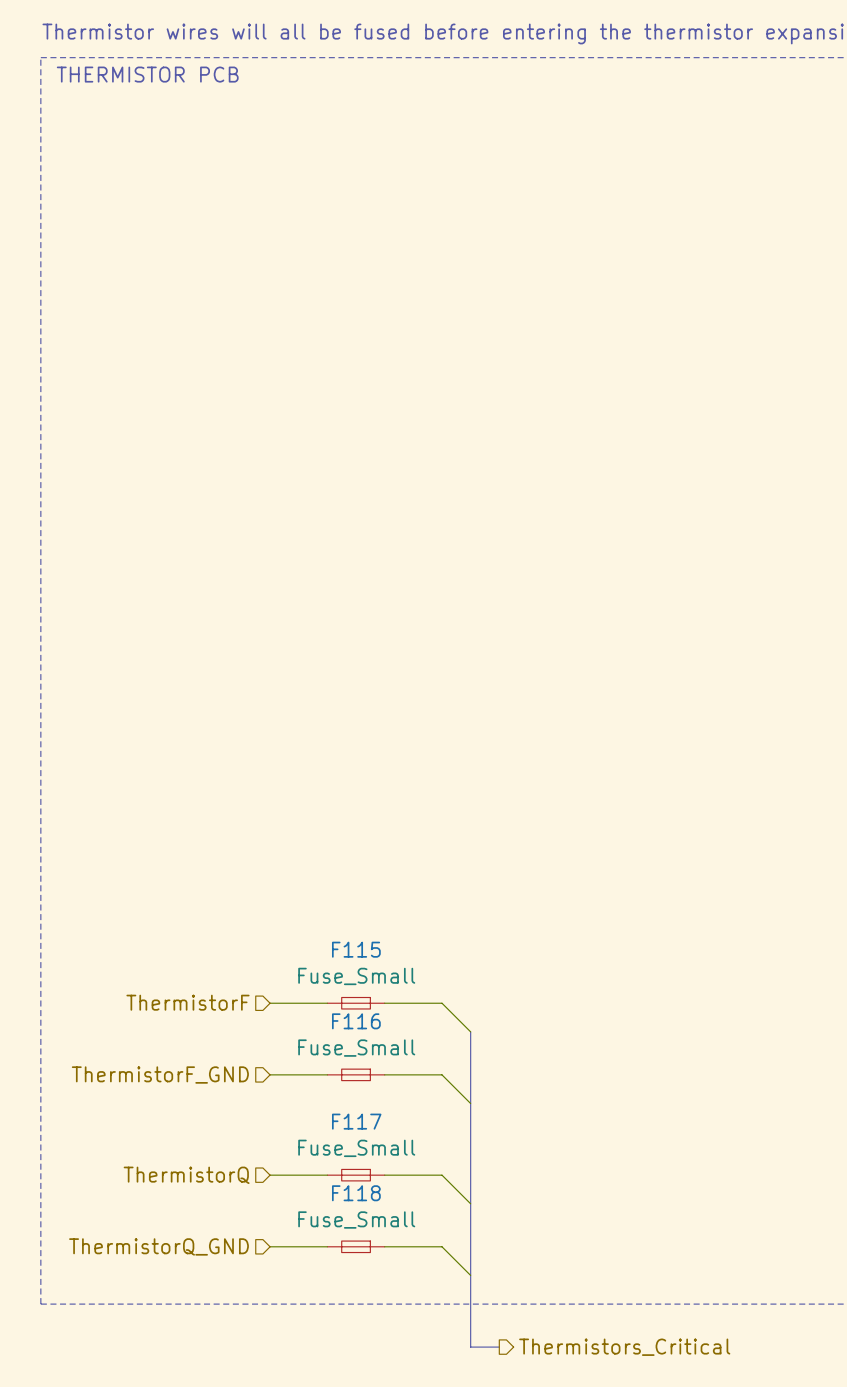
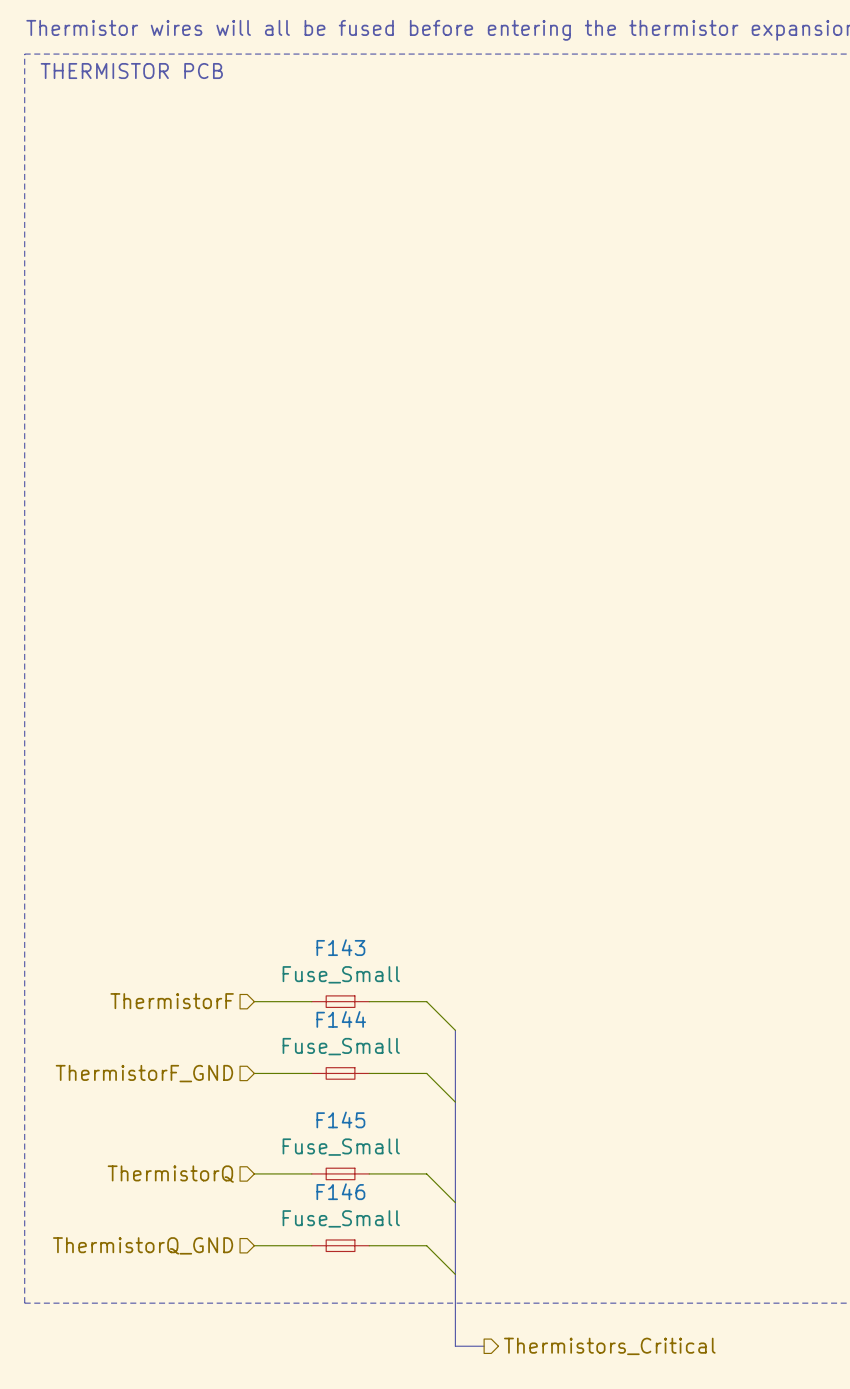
F115 name: F115 (356, 949) -> F143 (340, 947)
F116 name: F116 (356, 1021) -> F144 (341, 1019)
F117 name: F117 (356, 1121) -> F145 (340, 1119)
F118 name: F118 (356, 1193) -> F146 (340, 1191)

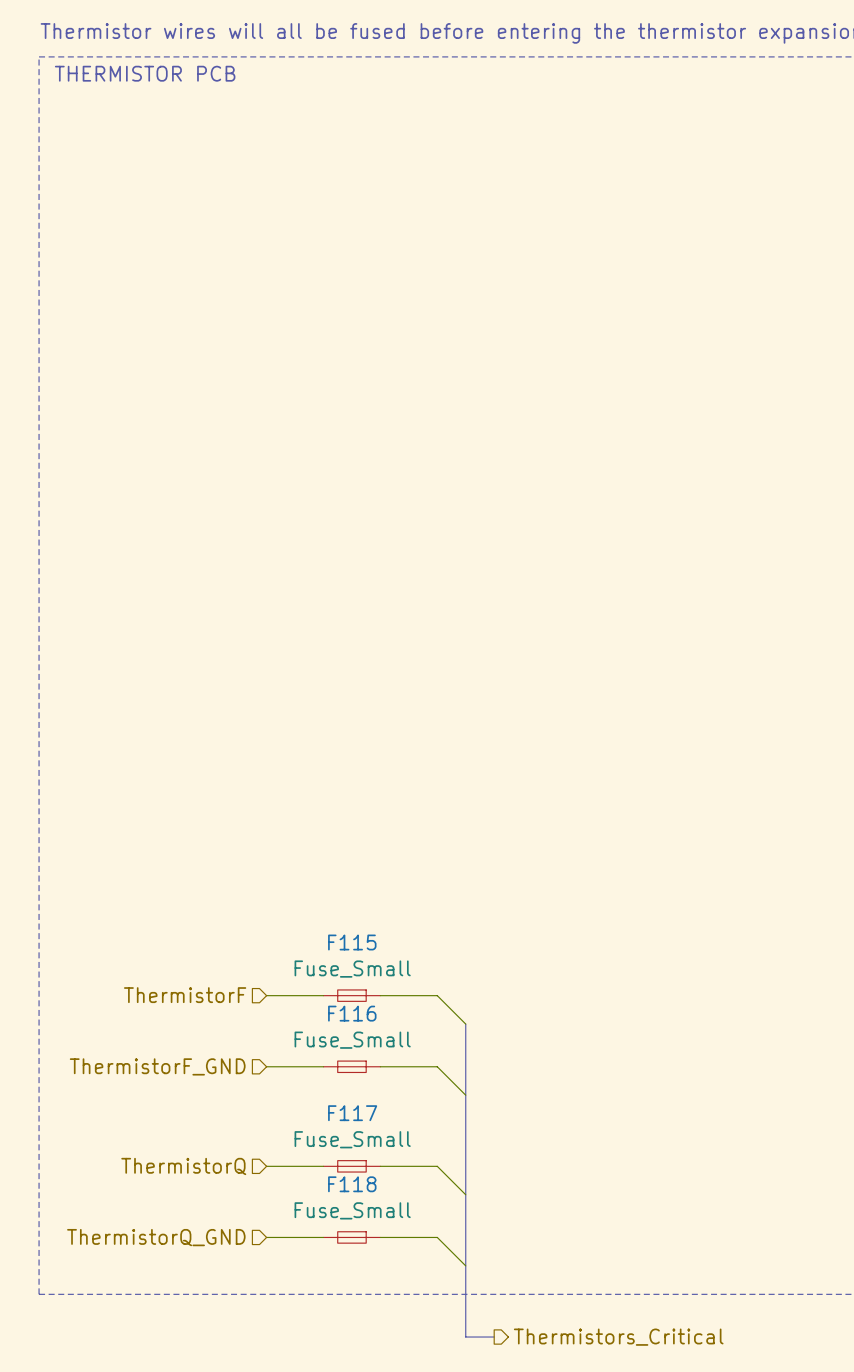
F143 name: F143 (340, 947) -> F115 (352, 942)
F144 name: F144 (341, 1019) -> F116 (352, 1013)
F145 name: F145 (340, 1119) -> F117 (352, 1113)
F146 name: F146 (340, 1191) -> F118 (352, 1184)

